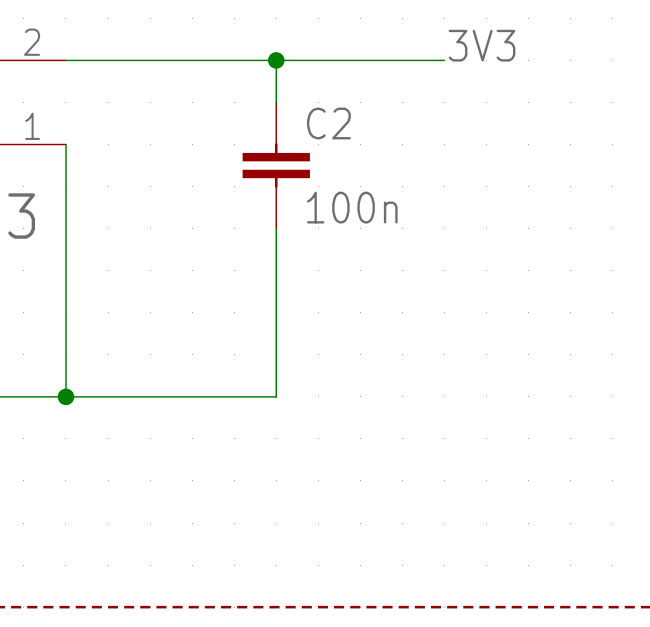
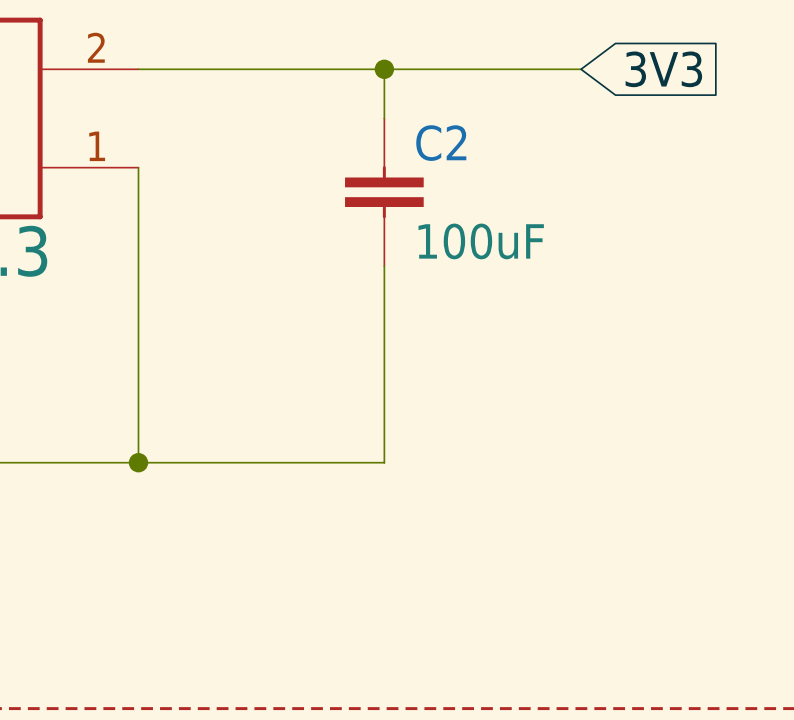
label: 3V3 (482, 45) -> none
global label: none -> 3V3 (663, 69)
C2 value: 100n (352, 207) -> 100uF (481, 241)

